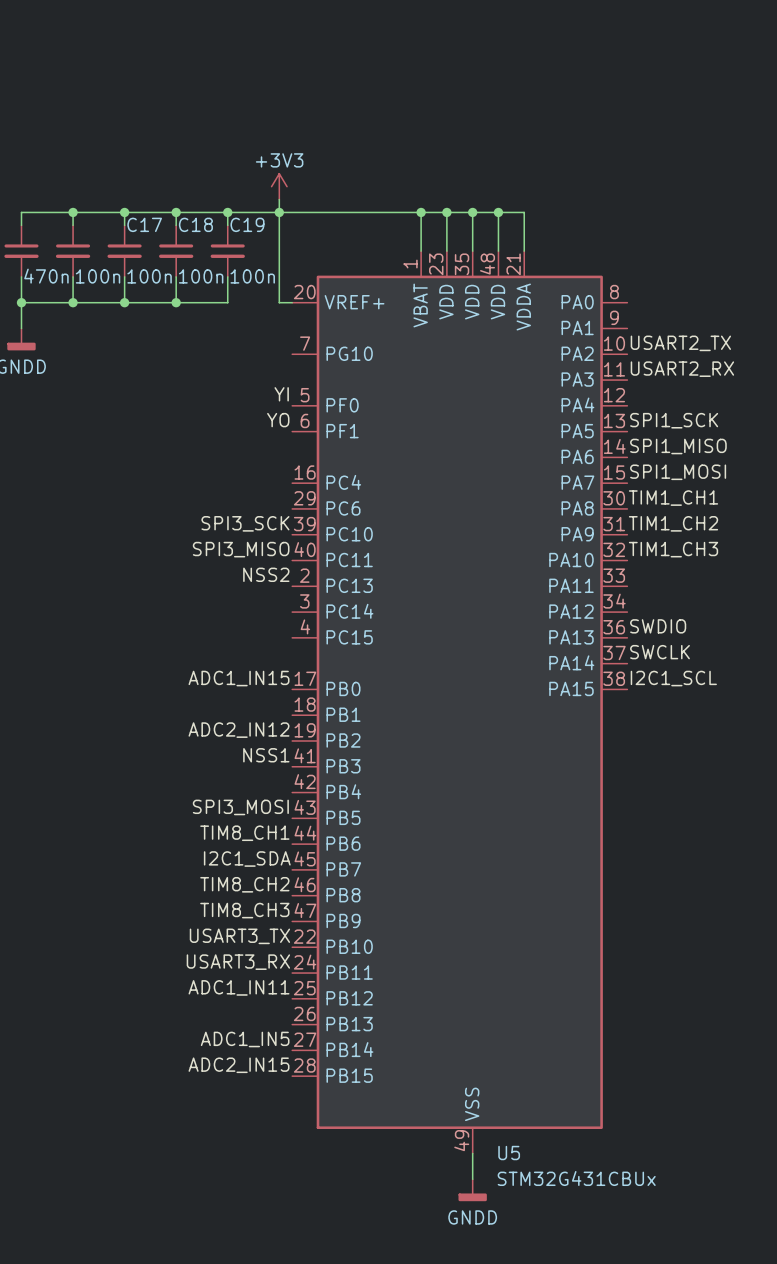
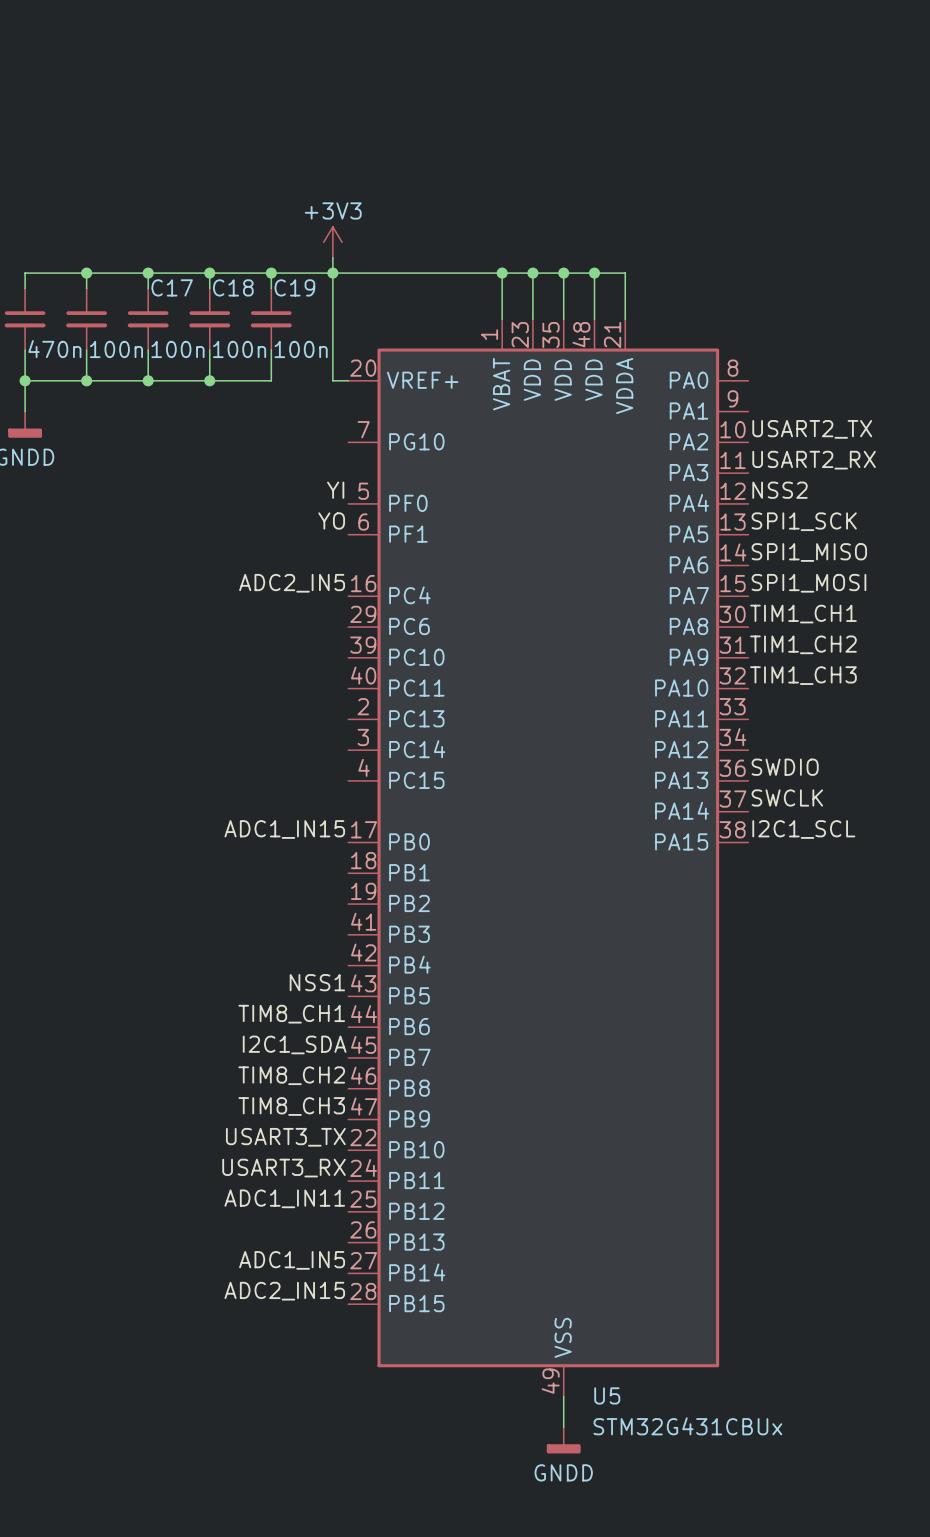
label: none -> NSS2 (780, 490)
label: none -> ADC2_IN5 (292, 583)
label: SPI3_SCK (245, 523) -> none
label: SPI3_MISO (241, 549) -> none
label: NSS2 (266, 574) -> none
label: ADC2_IN12 (239, 730) -> none
label: NSS1 (266, 755) -> none
label: SPI3_MOSI (240, 807) -> NSS1 (317, 982)

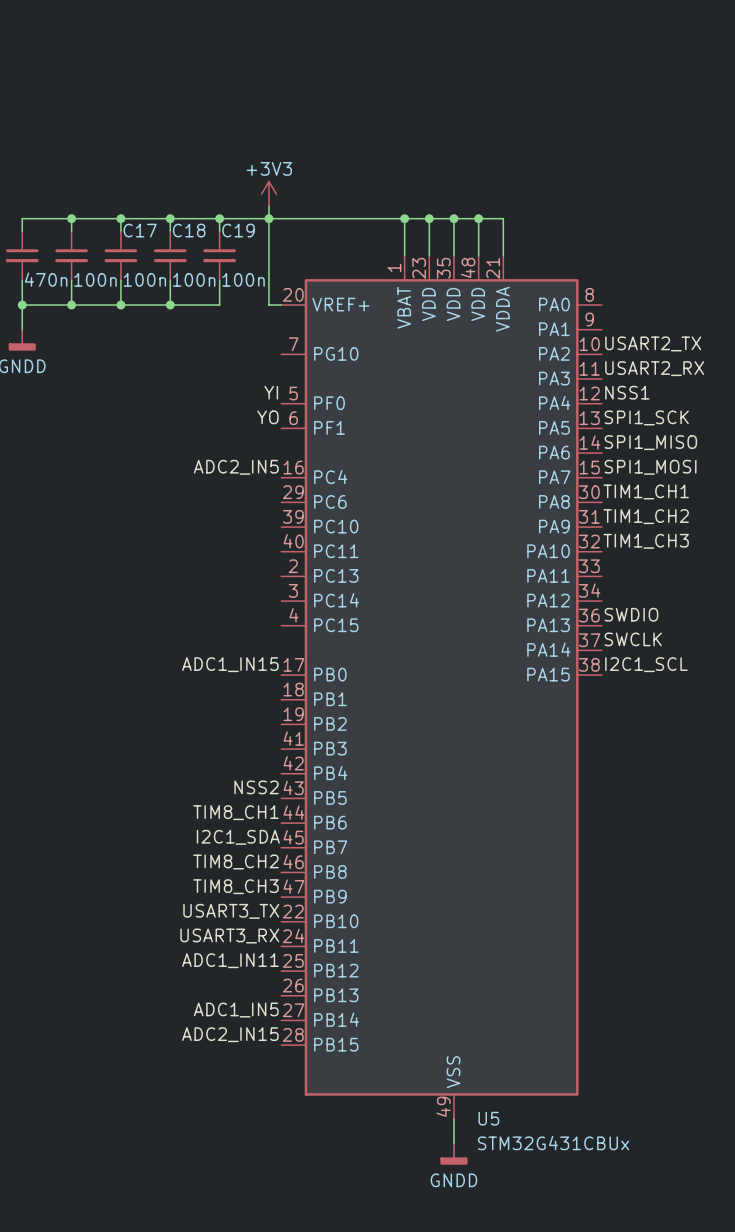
label: NSS2 (780, 490) -> NSS1 (627, 392)
label: NSS1 (317, 982) -> NSS2 (256, 787)

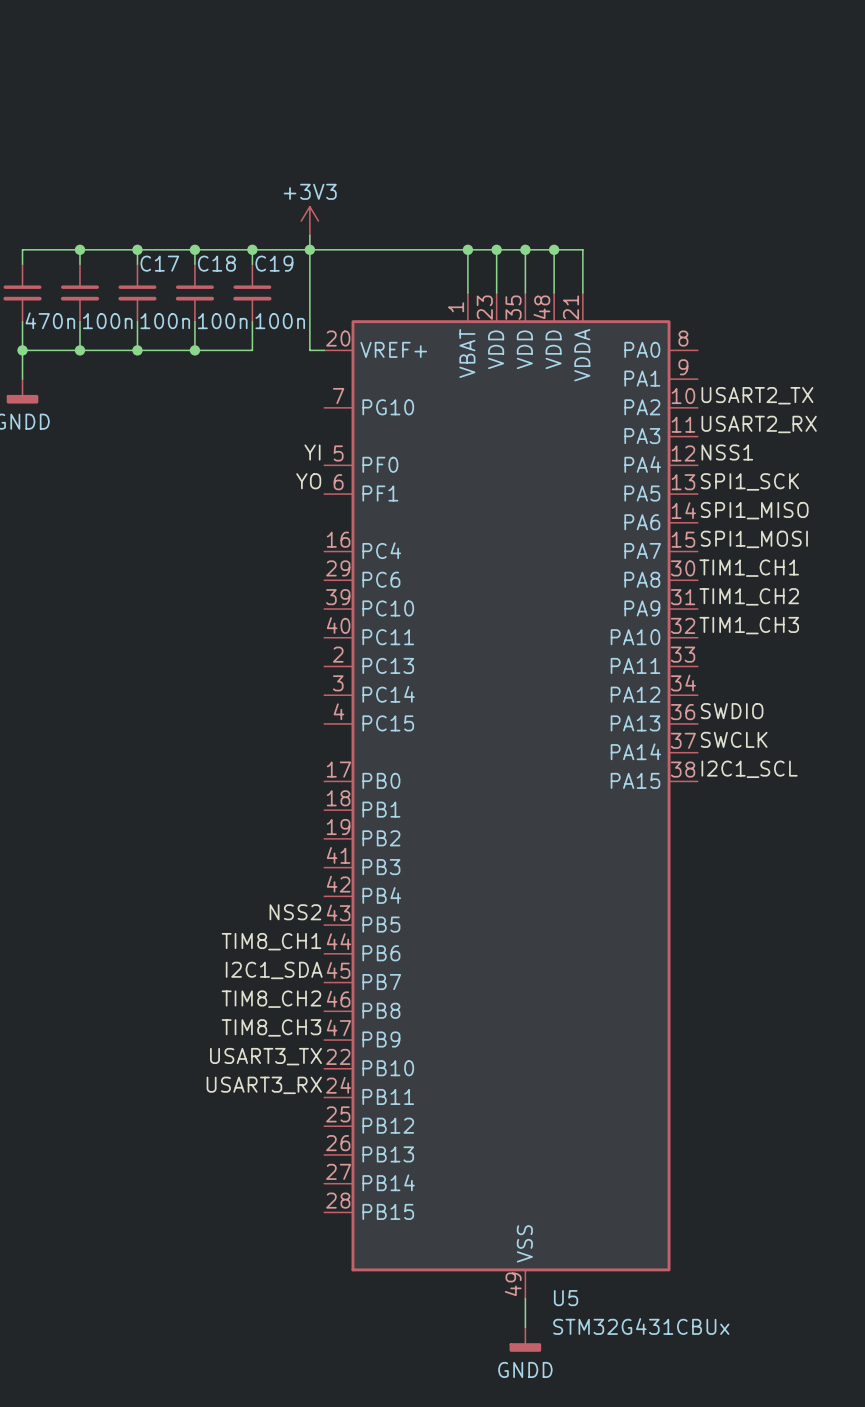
label: ADC2_IN5 (236, 467) -> none
label: ADC1_IN15 (230, 664) -> none
label: ADC1_IN11 (230, 960) -> none
label: ADC1_IN5 (236, 1010) -> none
label: ADC2_IN15 (230, 1034) -> none

